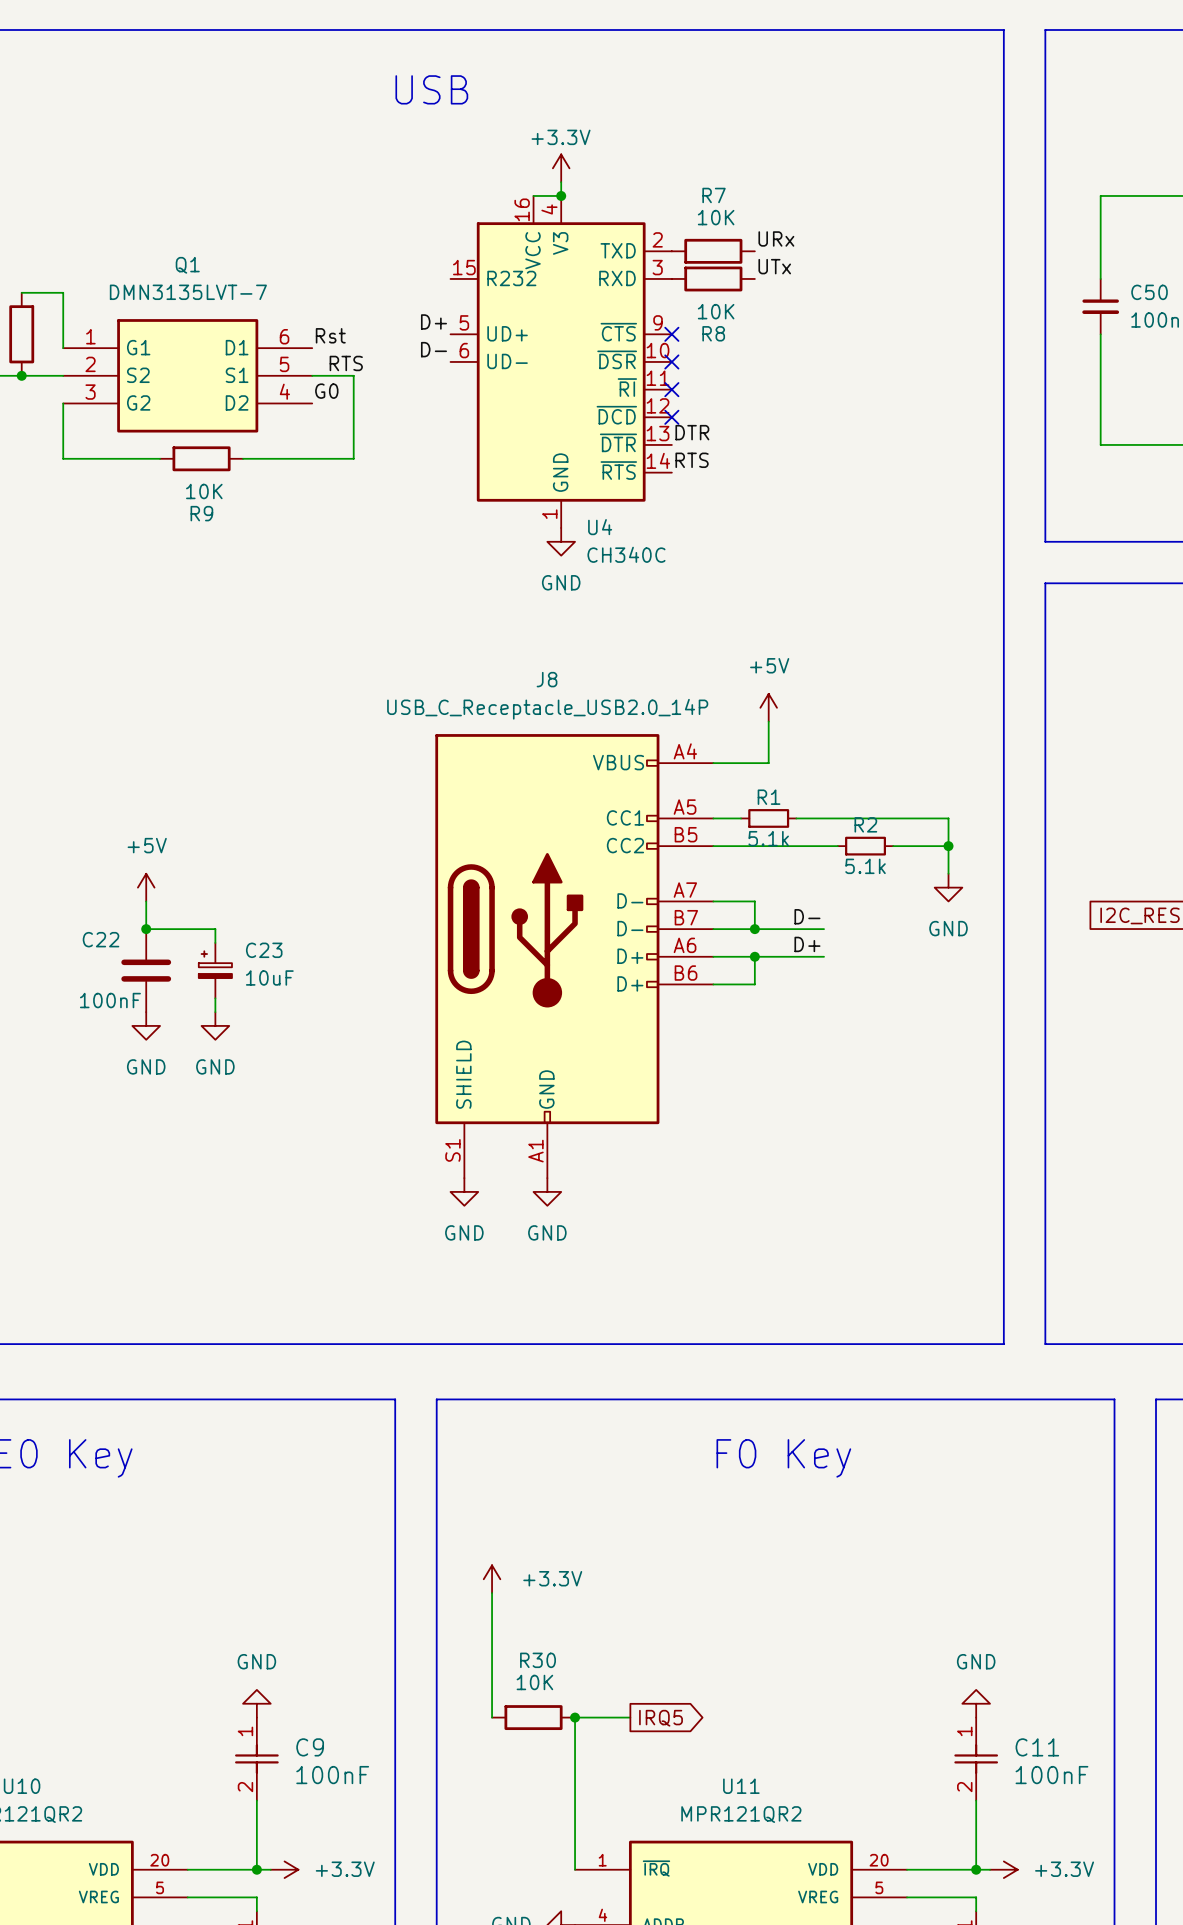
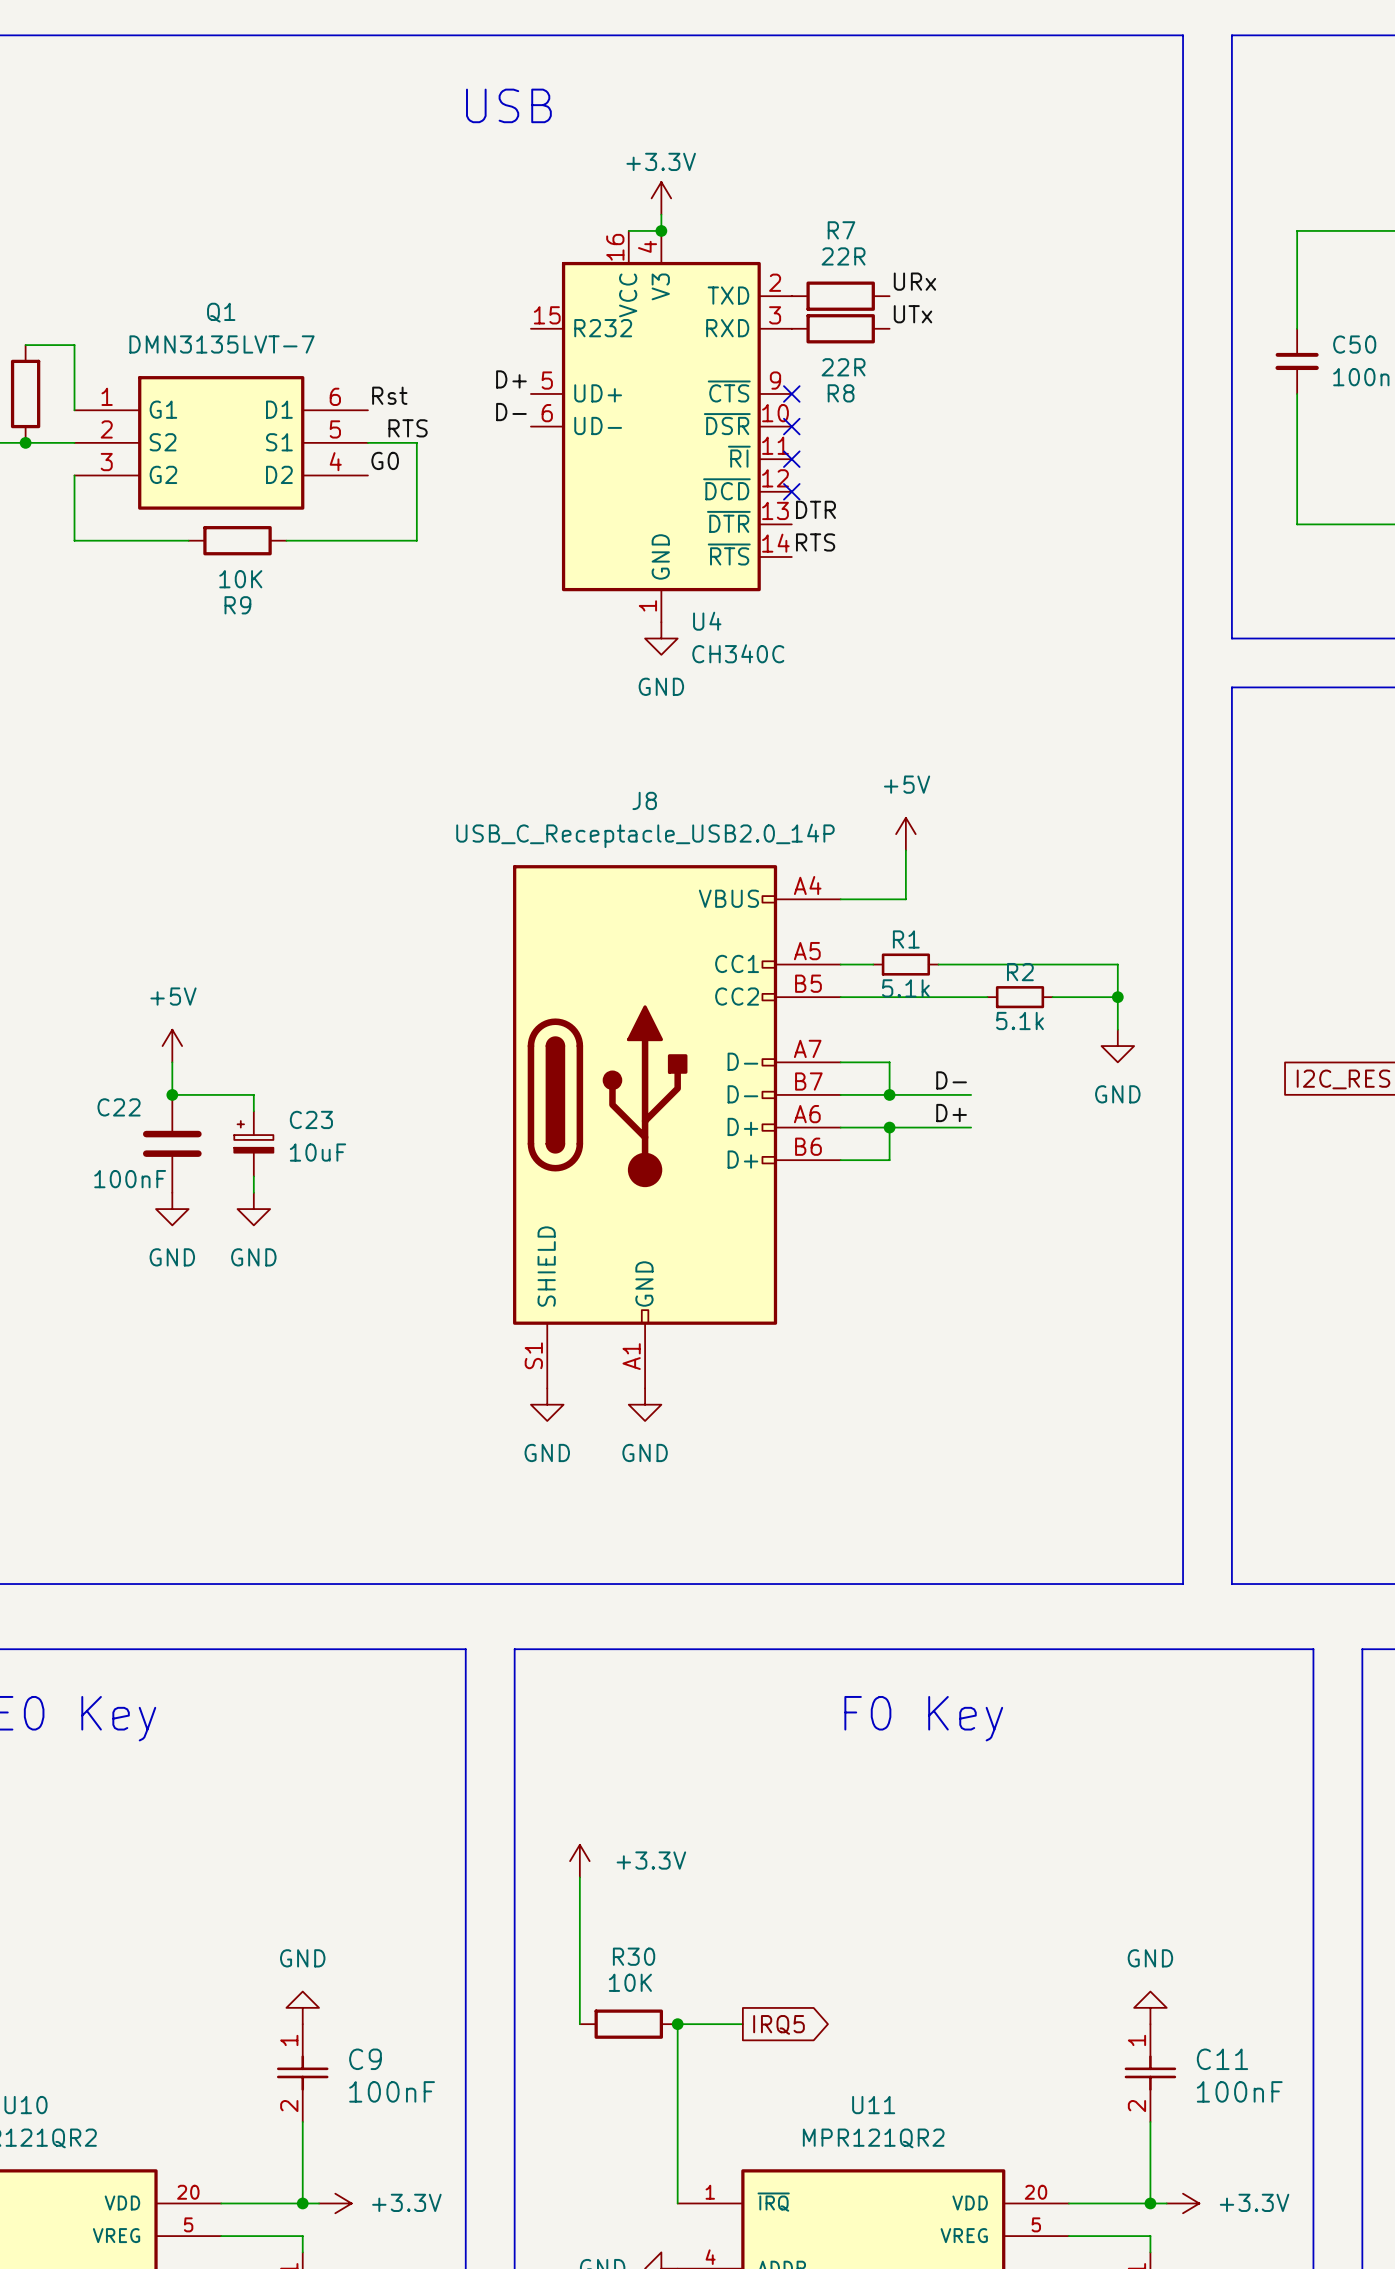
R7 value: 10K (716, 217) -> 22R (843, 256)
R8 value: 10K (716, 311) -> 22R (843, 367)

